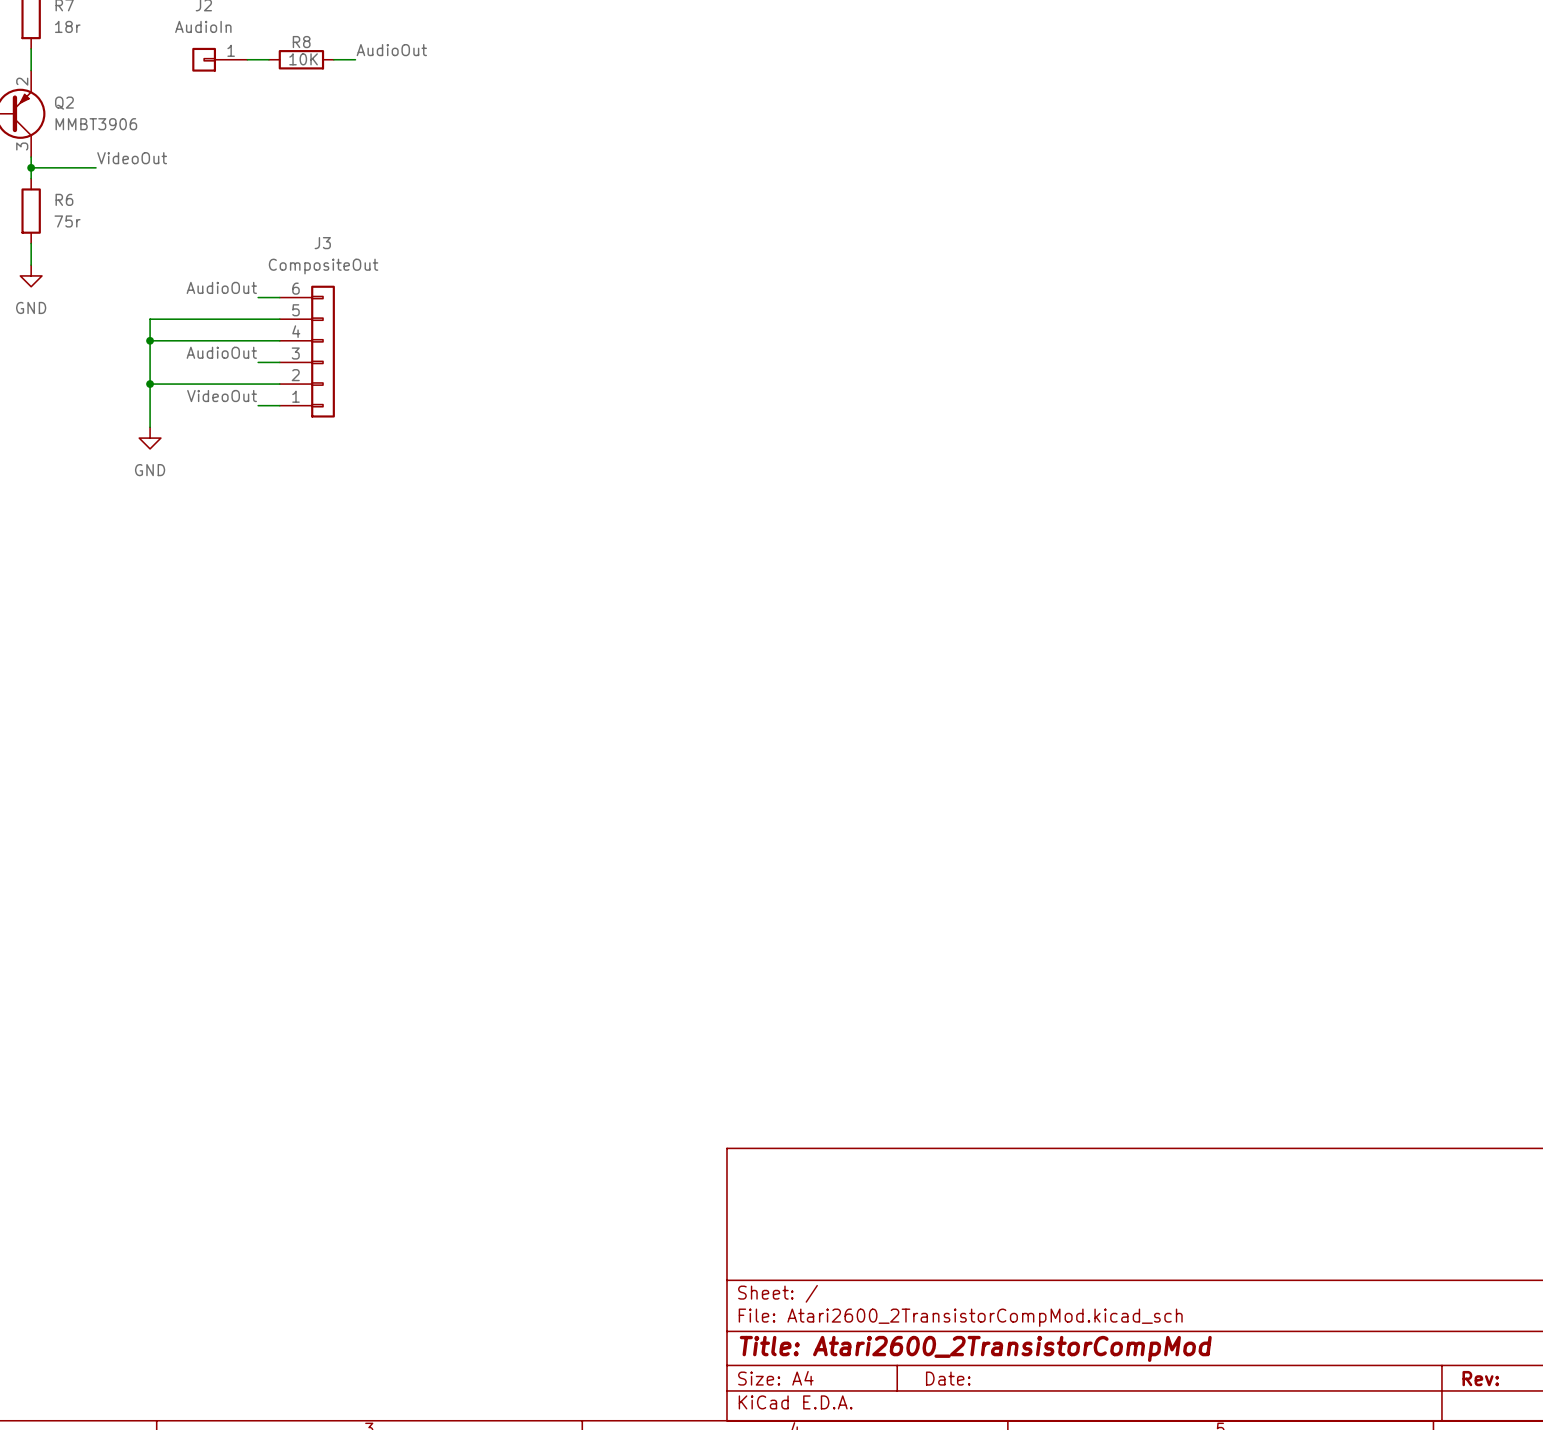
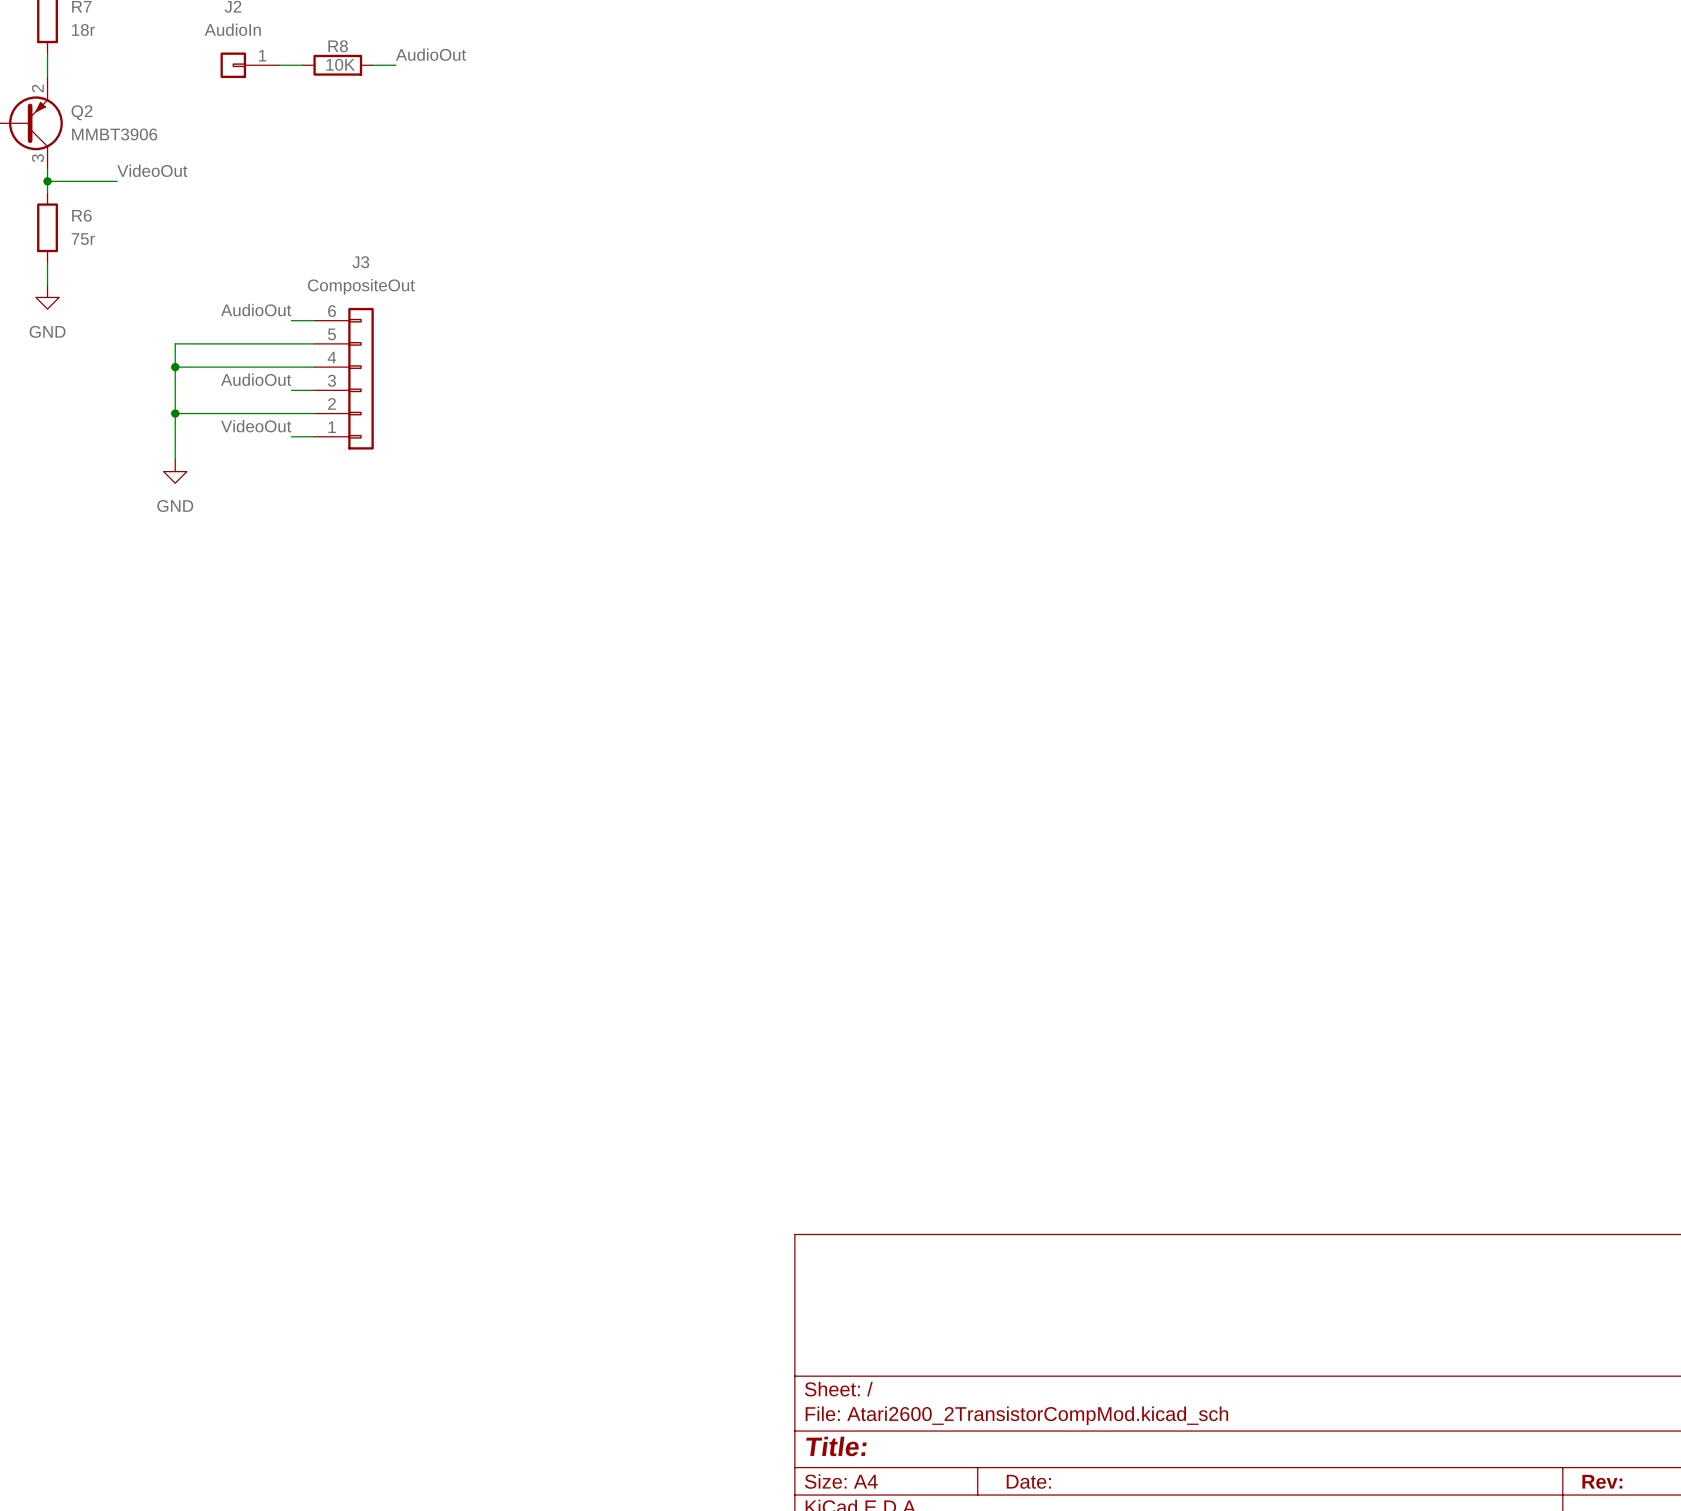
title block: Title: Atari2600_2TransistorCompMod (975, 1348) -> Title: (836, 1446)

